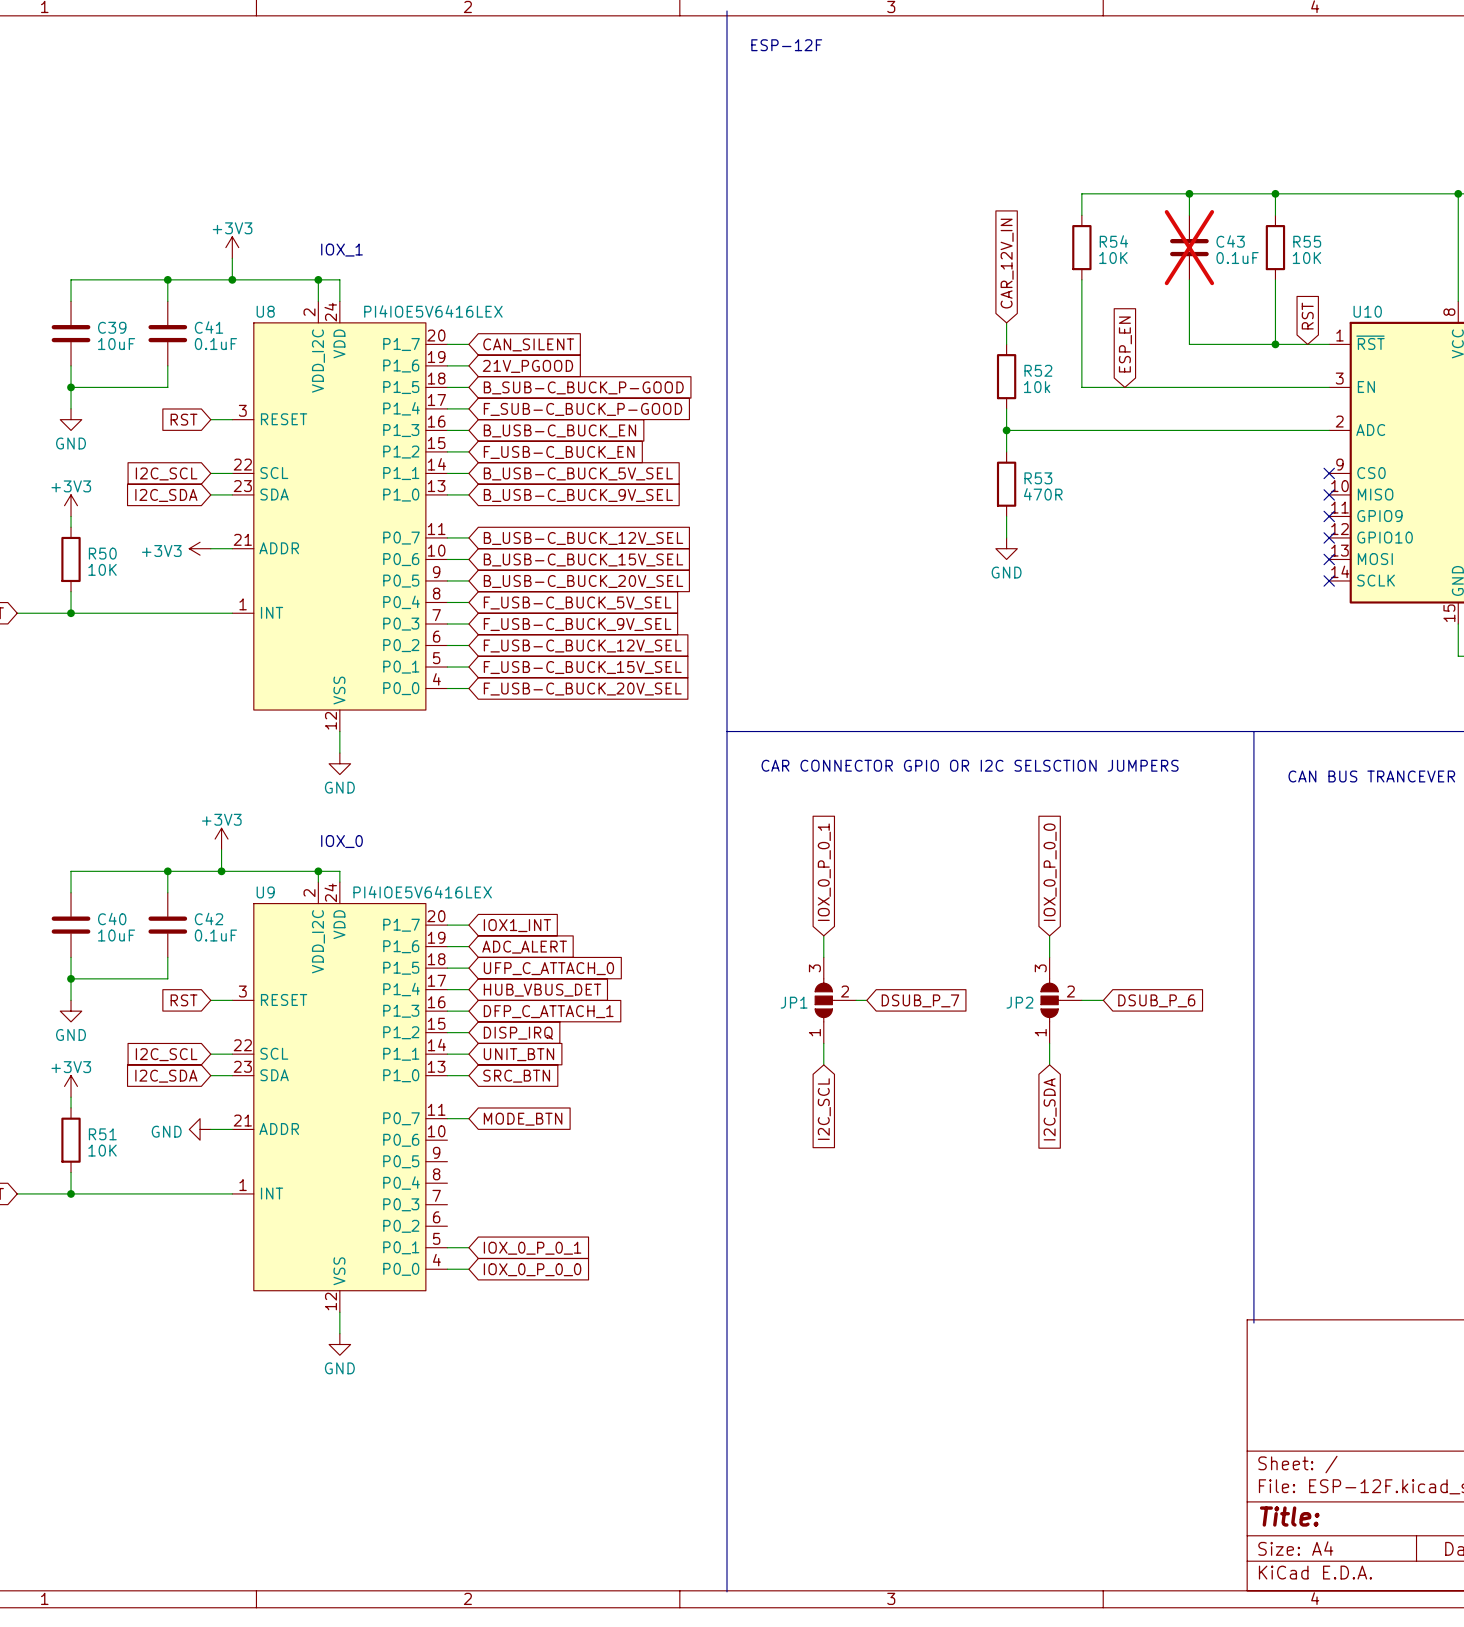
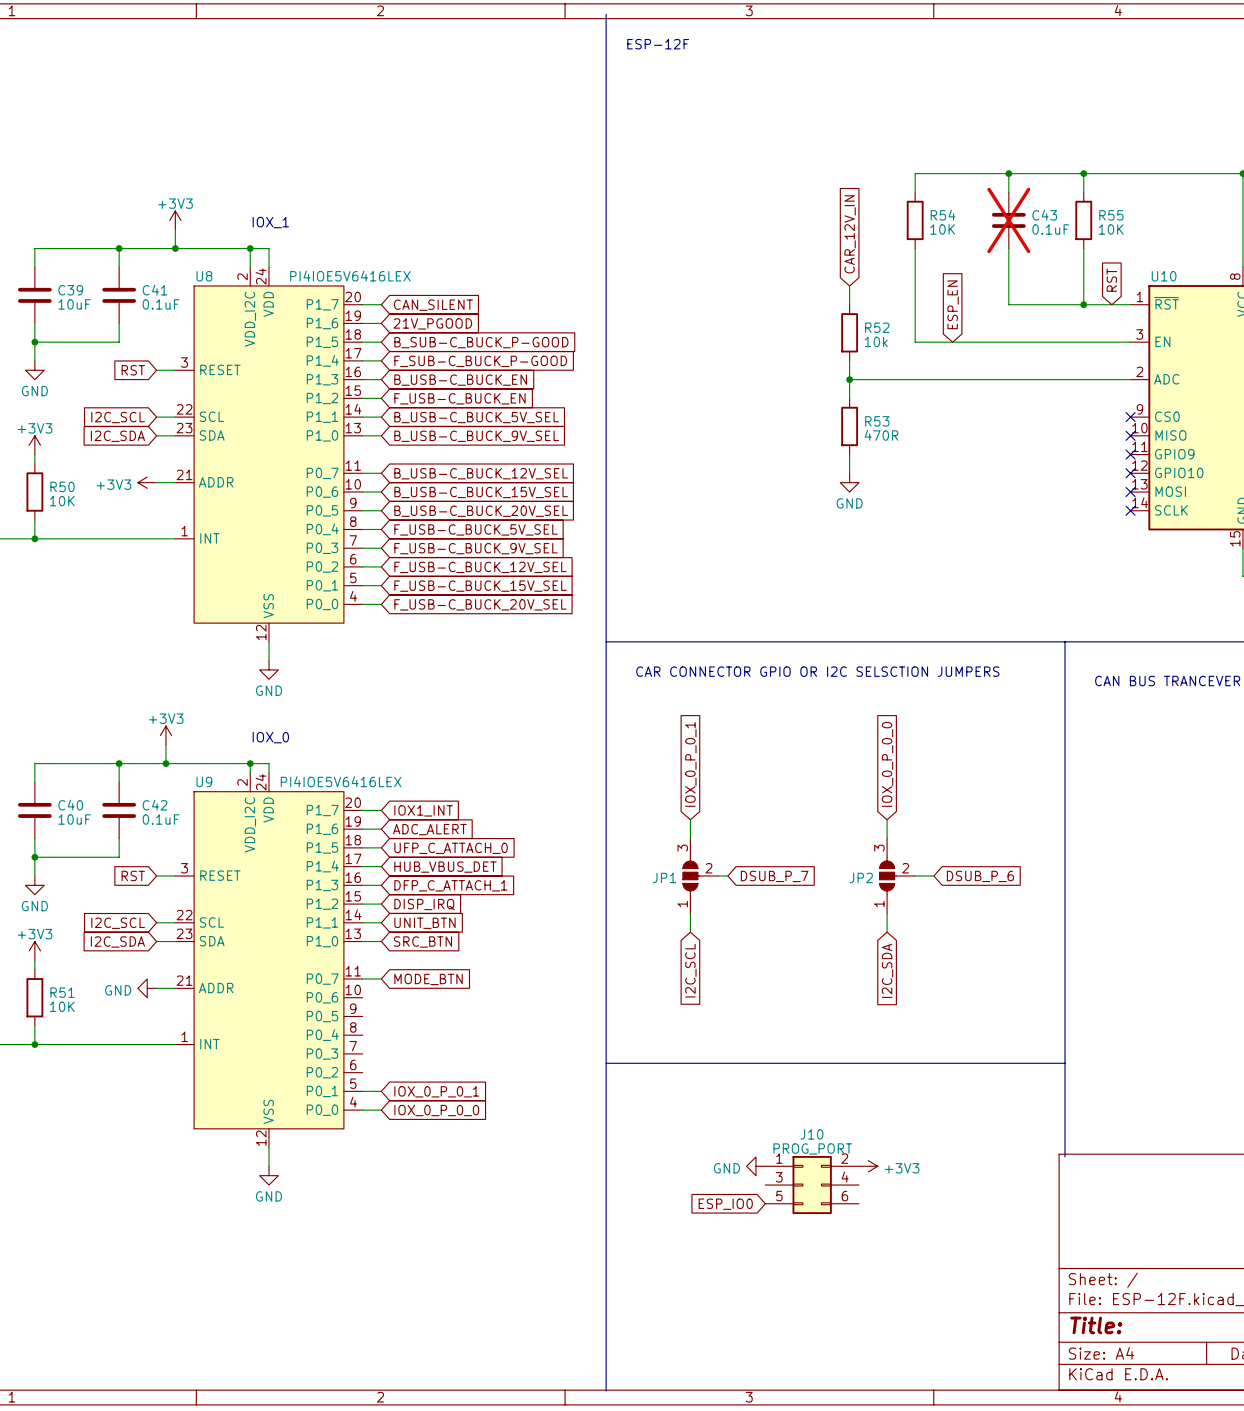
line: none -> (606, 1063) (1065, 1063)
power symbol: none -> GND (755, 1166)
power symbol: none -> +3V3 (868, 1166)
J10: none -> PROG_PORT (812, 1185)
global label: none -> ESP_IO0 (725, 1204)

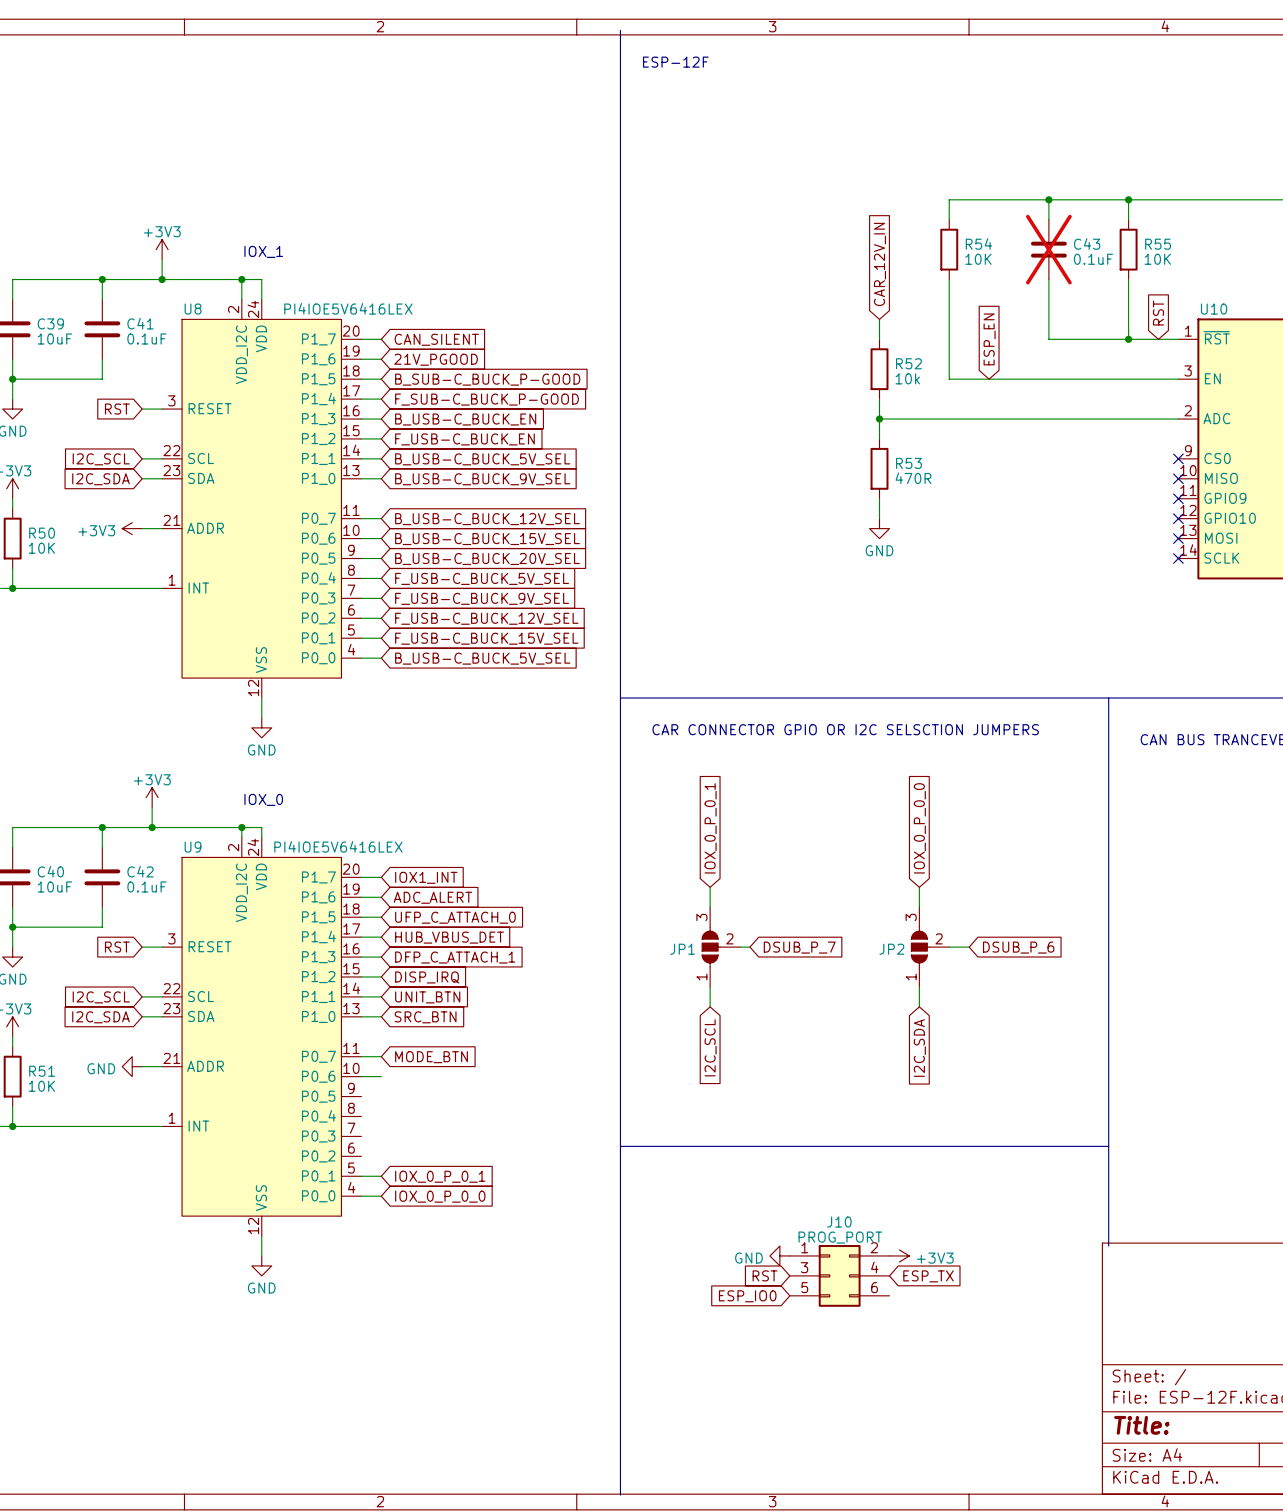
global label: F_USB-C_BUCK_20V_SEL (480, 604) -> B_USB-C_BUCK_5V_SEL (482, 658)
wire: none -> (361, 1076) (381, 1076)
global label: none -> RST (765, 1275)
global label: none -> ESP_TX (928, 1276)

